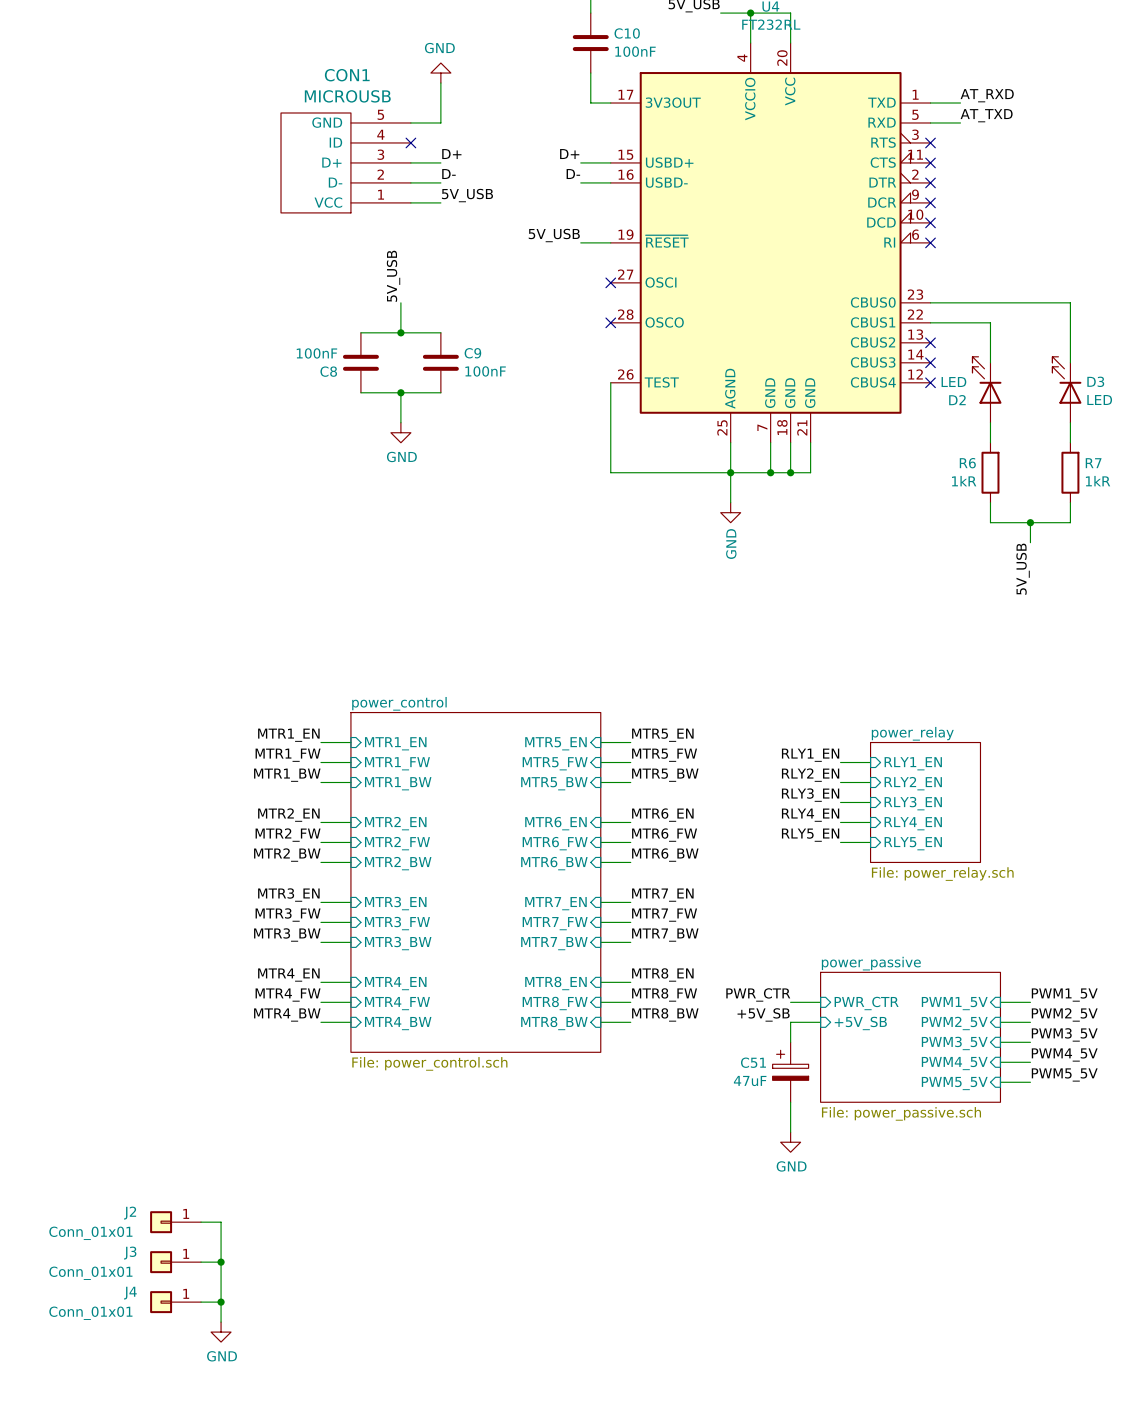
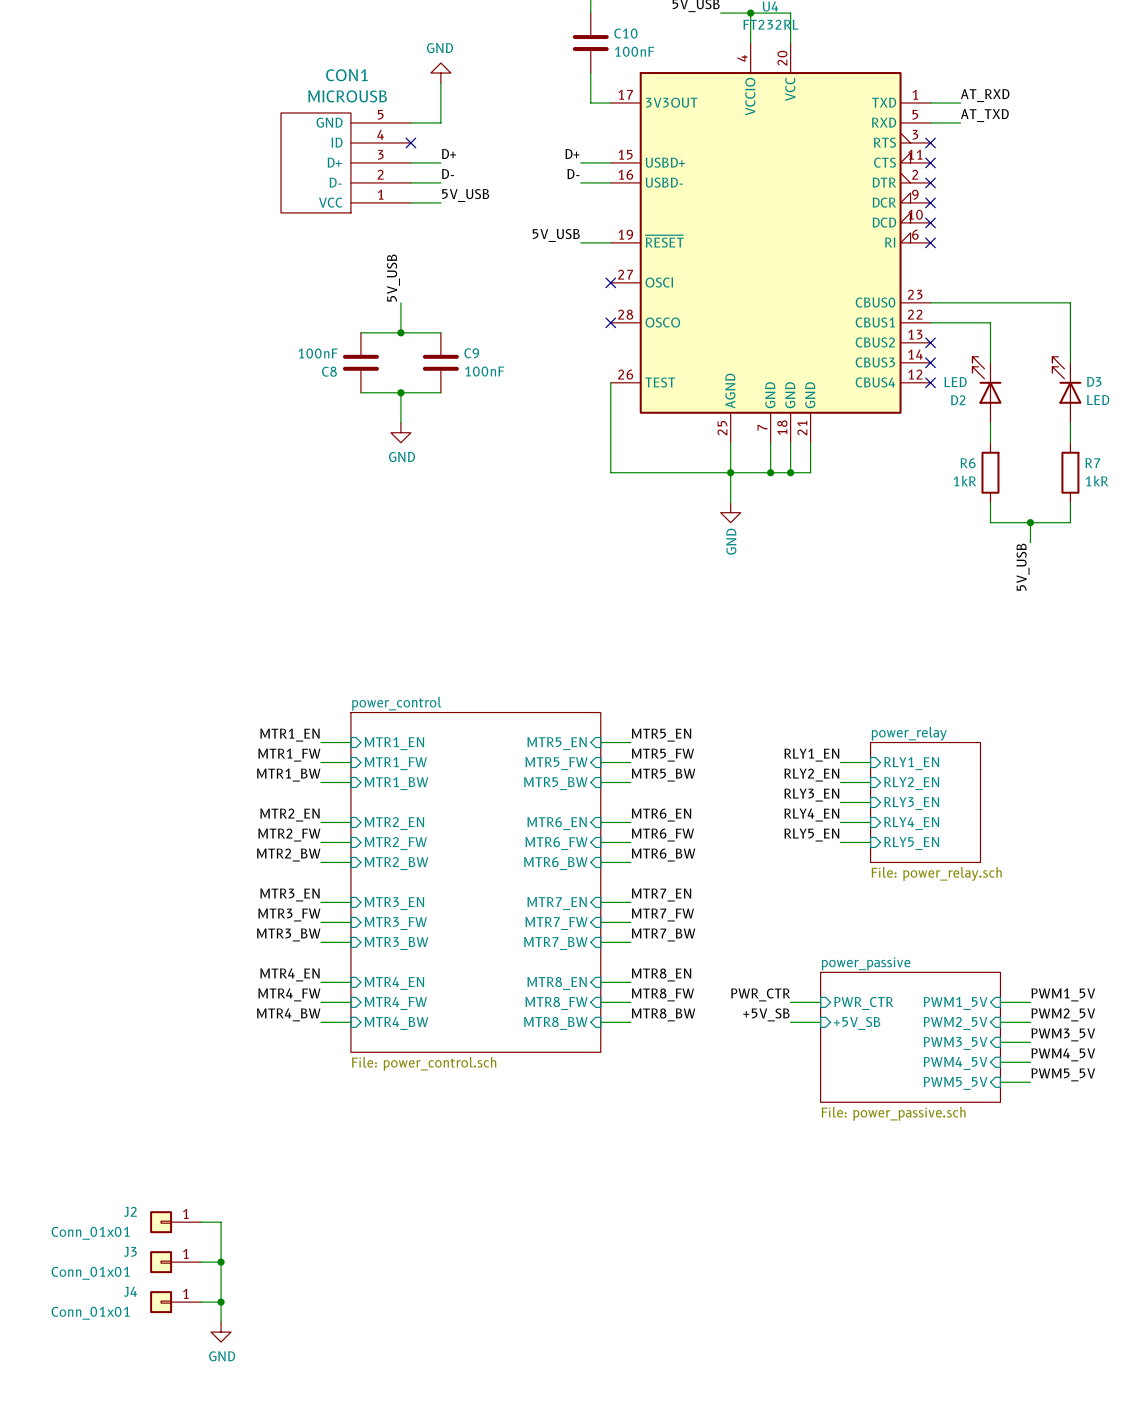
wire: (790, 1022) (790, 1042) -> none
C51: 47uF (790, 1072) -> none
wire: (790, 1102) (790, 1132) -> none
power symbol: GND (790, 1142) -> none

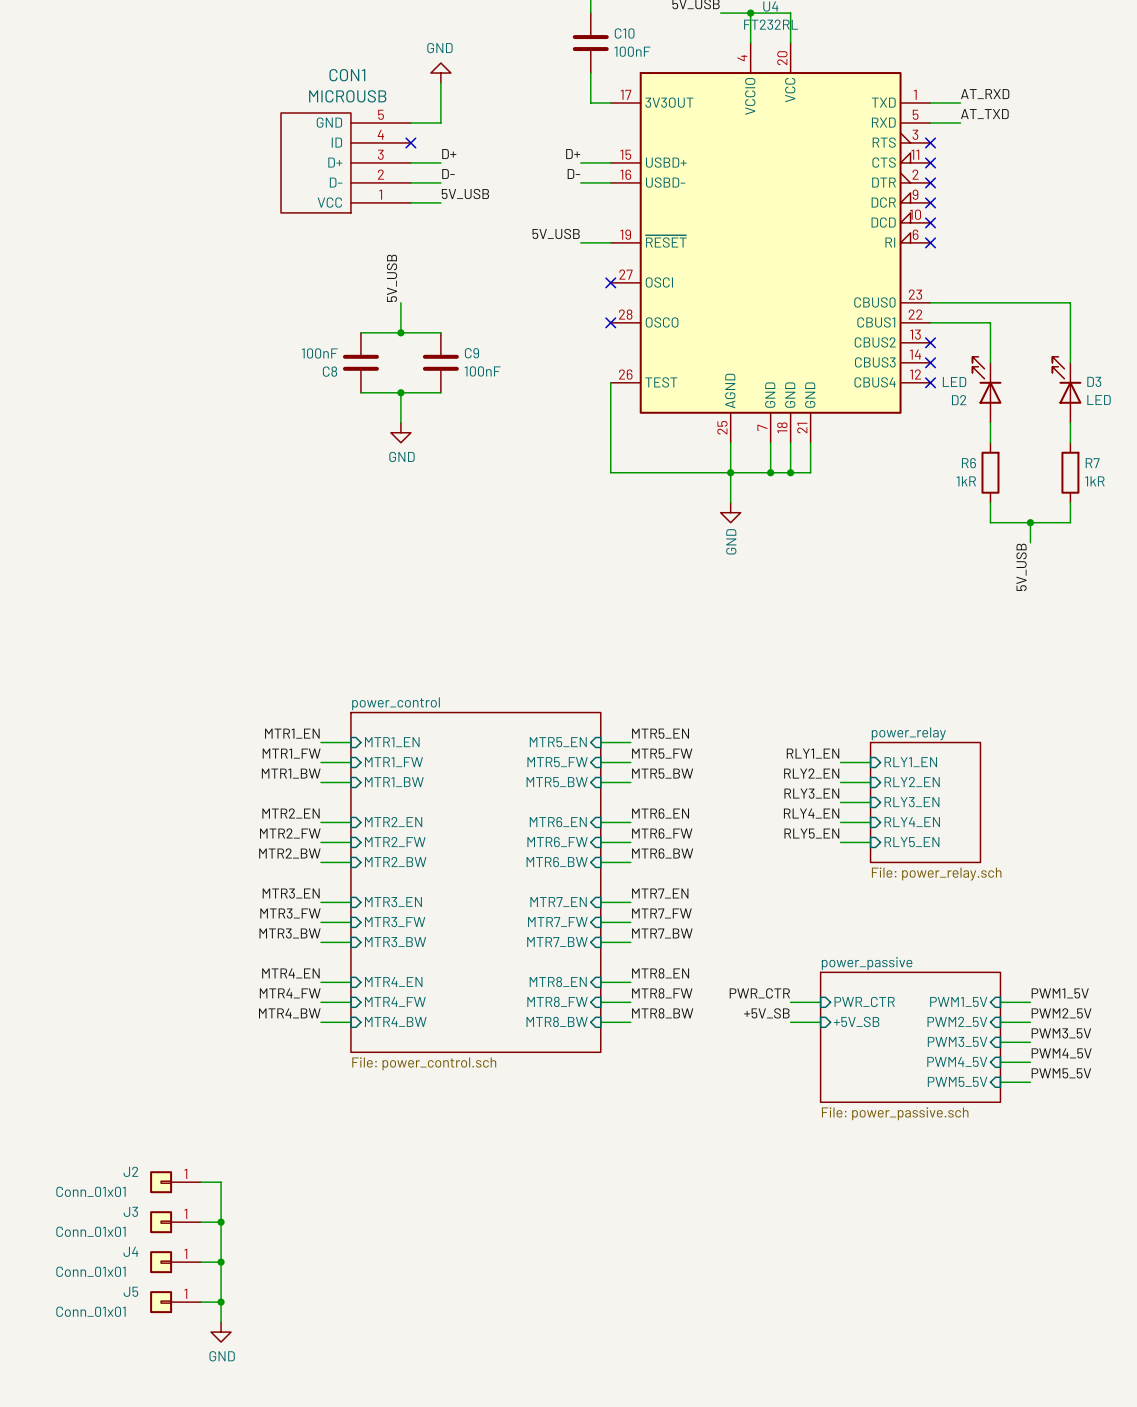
J2: none -> Conn_01x01 (175, 1182)
wire: none -> (201, 1182) (221, 1182) (221, 1222)
J2 name: J2 (130, 1211) -> J3 (130, 1211)
junction: none -> (221, 1222)
J3 name: J3 (130, 1251) -> J4 (130, 1251)
J4 name: J4 (130, 1291) -> J5 (130, 1291)

